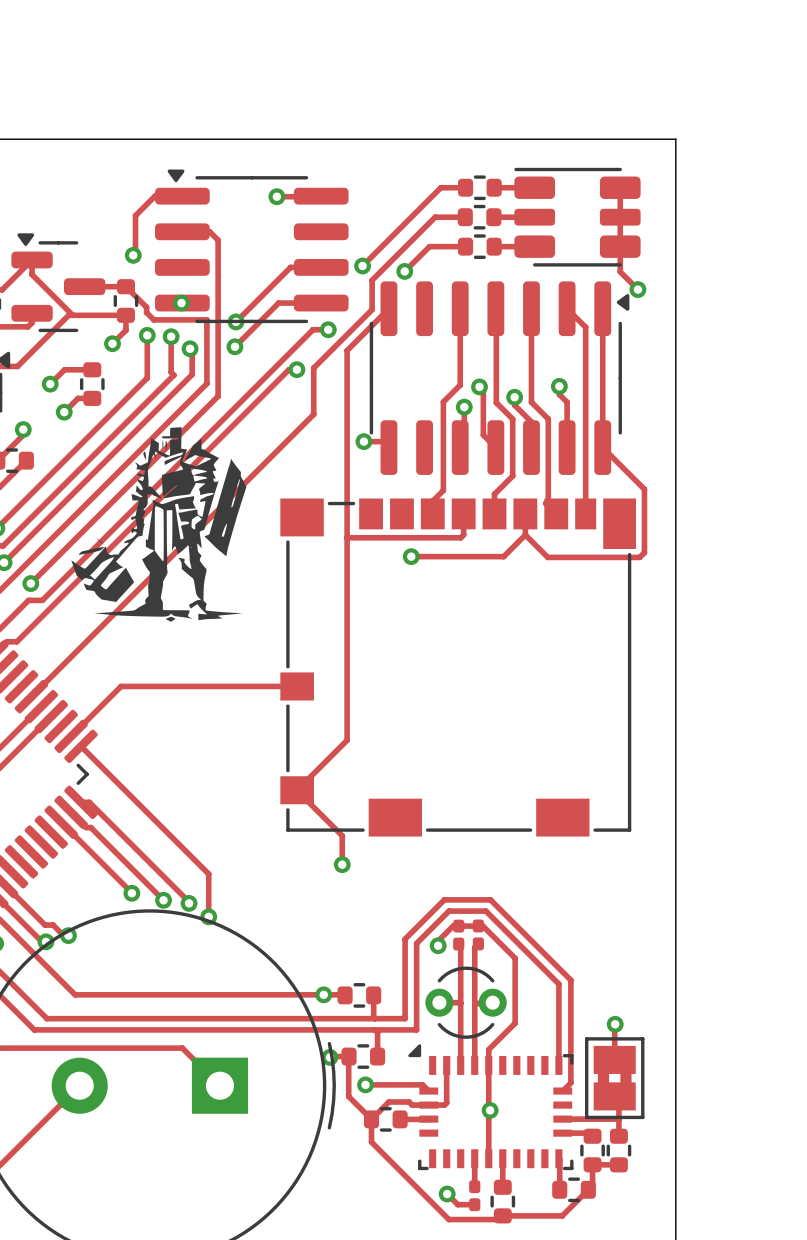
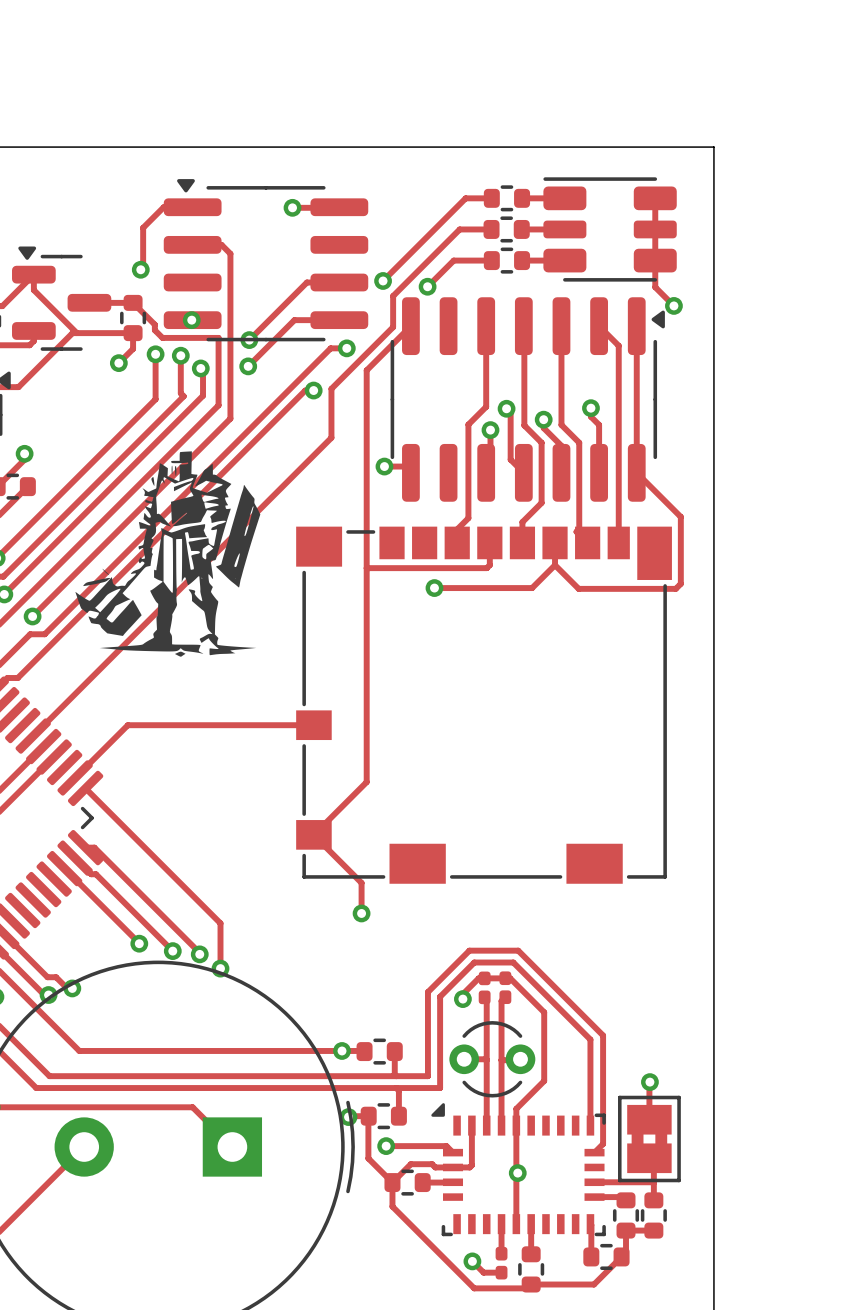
track: (92, 369) (64, 369) (50, 384) -> none
via: (50, 384) -> none
part: (92, 384) -> none
track: (92, 398) (78, 398) (64, 412) -> none
via: (64, 412) -> none

